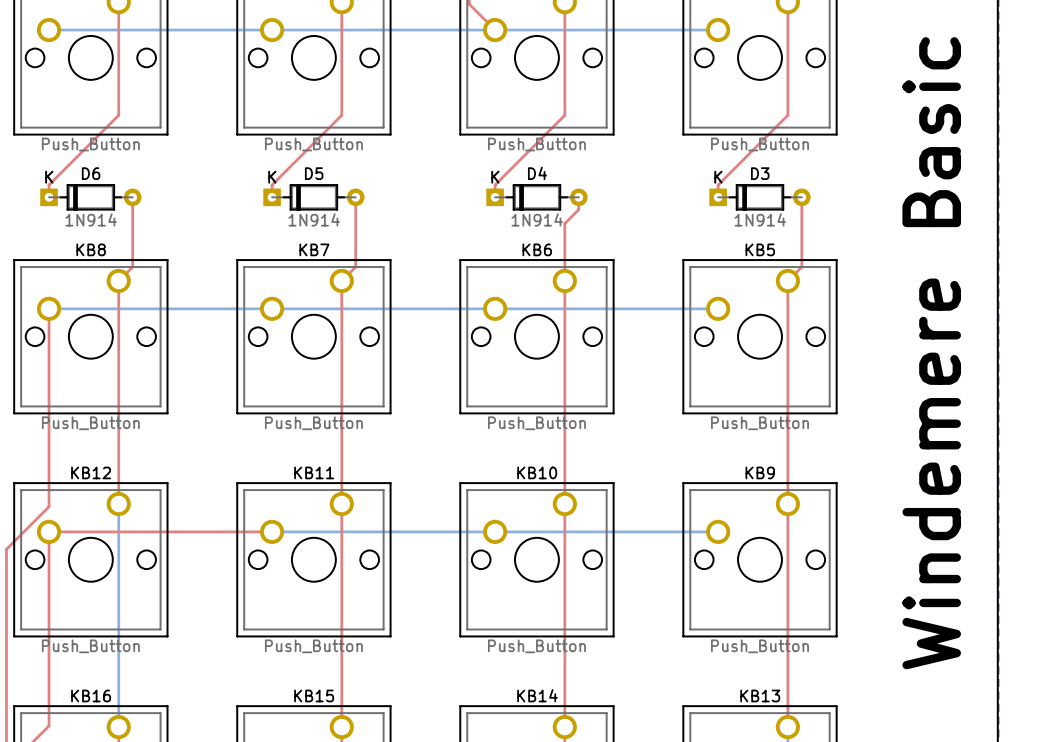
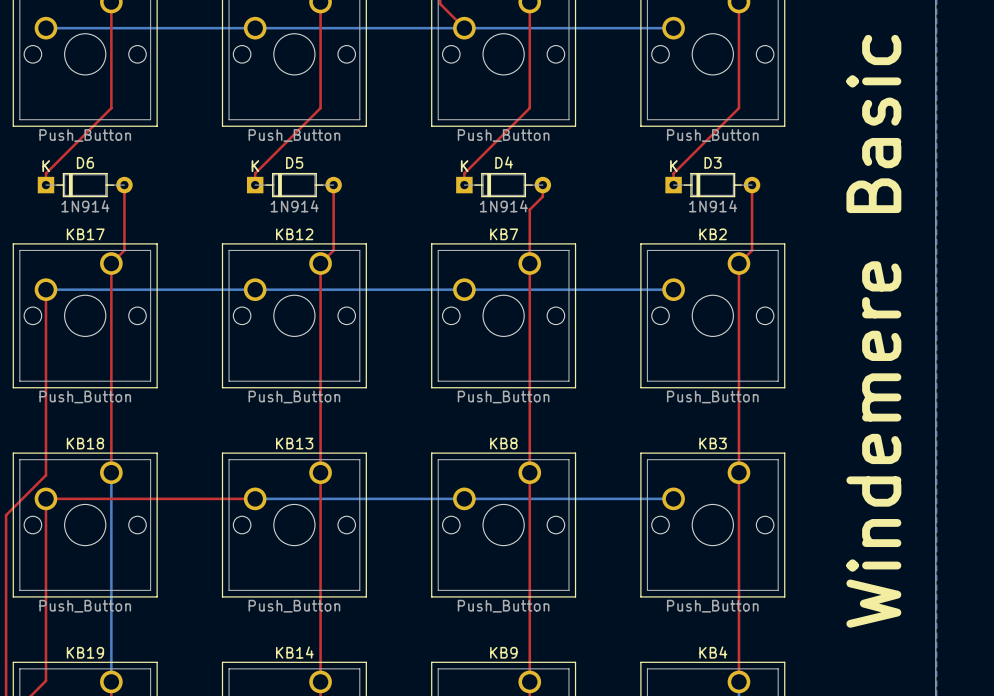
KB8 name: KB8 (91, 249) -> KB17 (85, 234)
KB7 name: KB7 (314, 249) -> KB12 (294, 234)
KB6 name: KB6 (537, 249) -> KB7 (504, 234)
KB5 name: KB5 (760, 249) -> KB2 (713, 234)
KB12 name: KB12 (91, 472) -> KB18 (85, 443)
KB11 name: KB11 (314, 472) -> KB13 (294, 443)
KB10 name: KB10 (537, 472) -> KB8 (503, 443)
KB9 name: KB9 (760, 472) -> KB3 (713, 443)
KB16 name: KB16 (91, 695) -> KB19 (85, 652)
KB15 name: KB15 (314, 695) -> KB14 (294, 652)
KB14 name: KB14 (537, 695) -> KB9 (503, 652)
KB13 name: KB13 (760, 695) -> KB4 (713, 652)

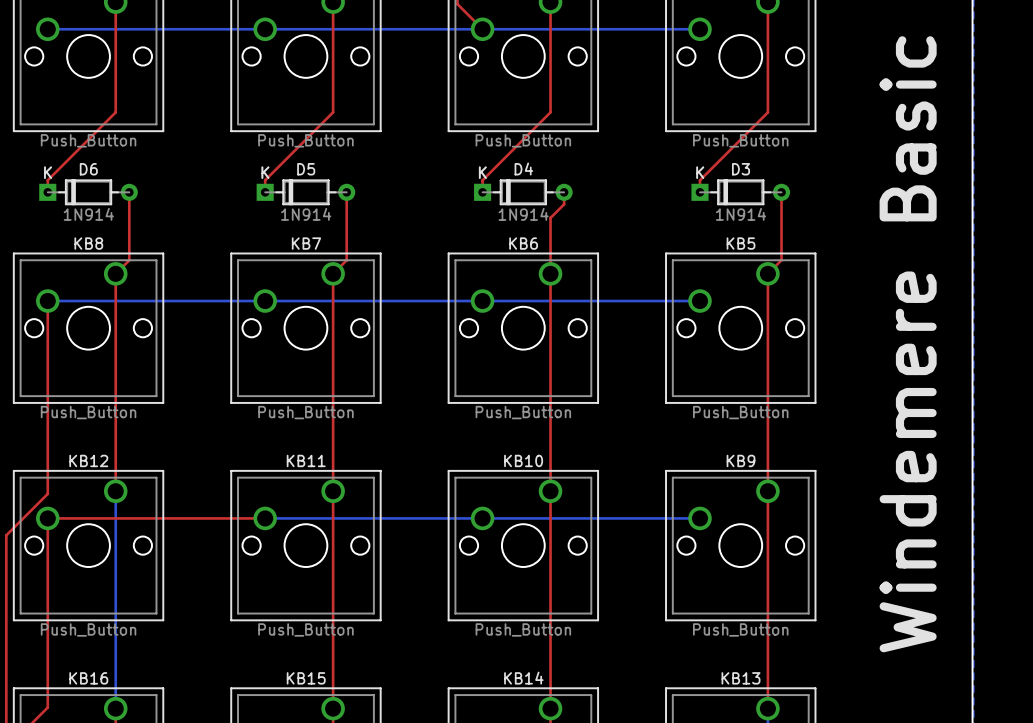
KB17 name: KB17 (85, 234) -> KB8 (88, 243)
KB12 name: KB12 (294, 234) -> KB7 (306, 243)
KB7 name: KB7 (504, 234) -> KB6 (523, 243)
KB2 name: KB2 (713, 234) -> KB5 (741, 243)
KB18 name: KB18 (85, 443) -> KB12 (88, 460)
KB13 name: KB13 (294, 443) -> KB11 (306, 460)
KB8 name: KB8 (503, 443) -> KB10 (523, 460)
KB3 name: KB3 (713, 443) -> KB9 (741, 460)
KB19 name: KB19 (85, 652) -> KB16 (88, 678)
KB14 name: KB14 (294, 652) -> KB15 (306, 678)
KB9 name: KB9 (503, 652) -> KB14 (523, 678)
KB4 name: KB4 (713, 652) -> KB13 (741, 678)

